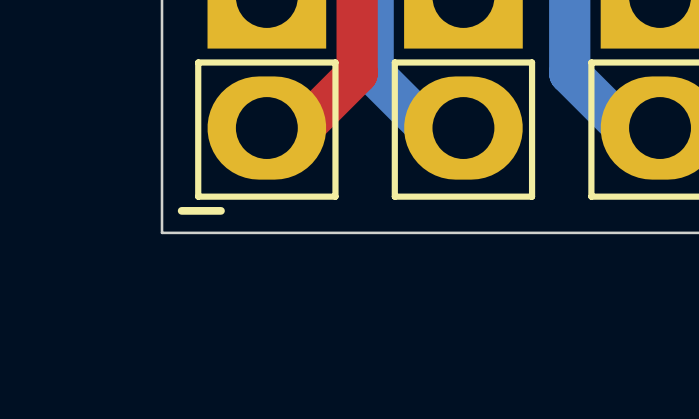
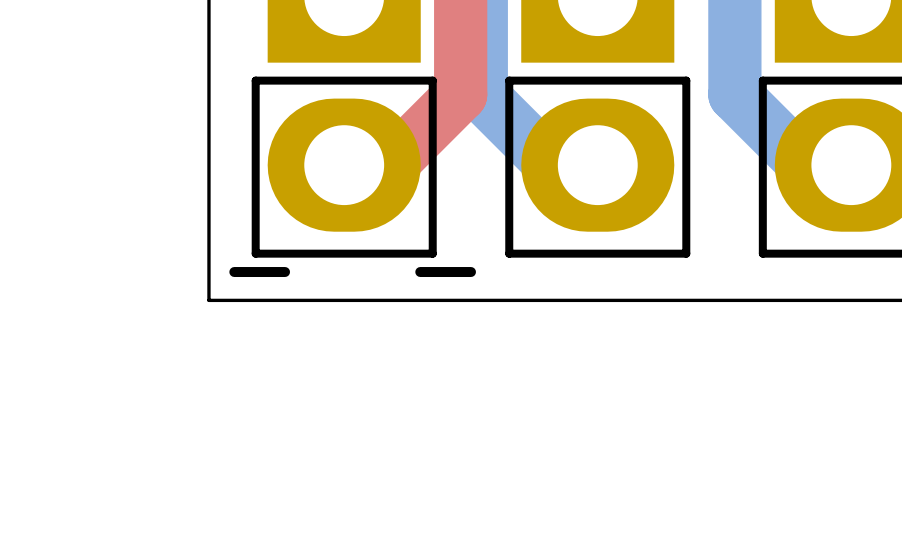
text: none -> - (445, 272)

